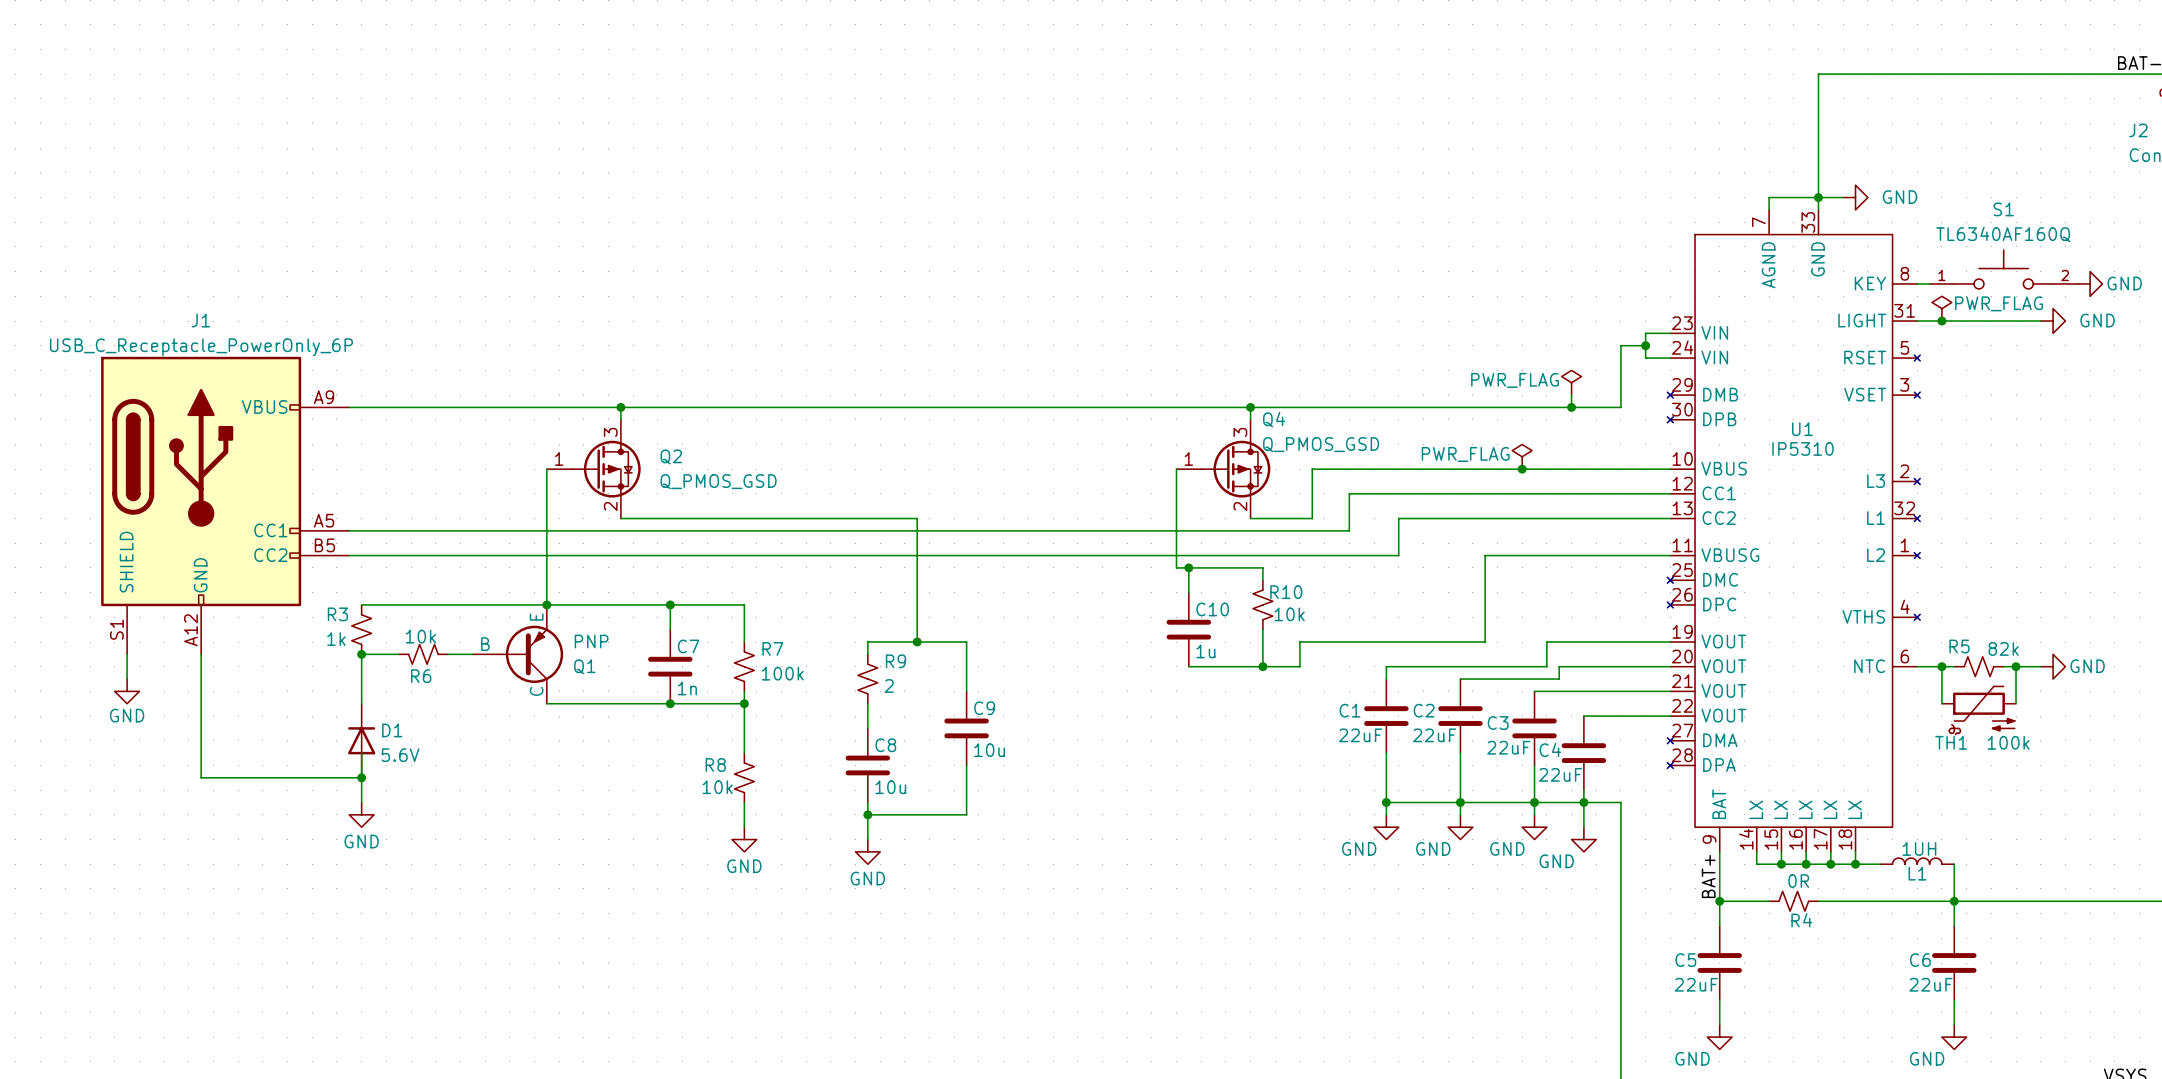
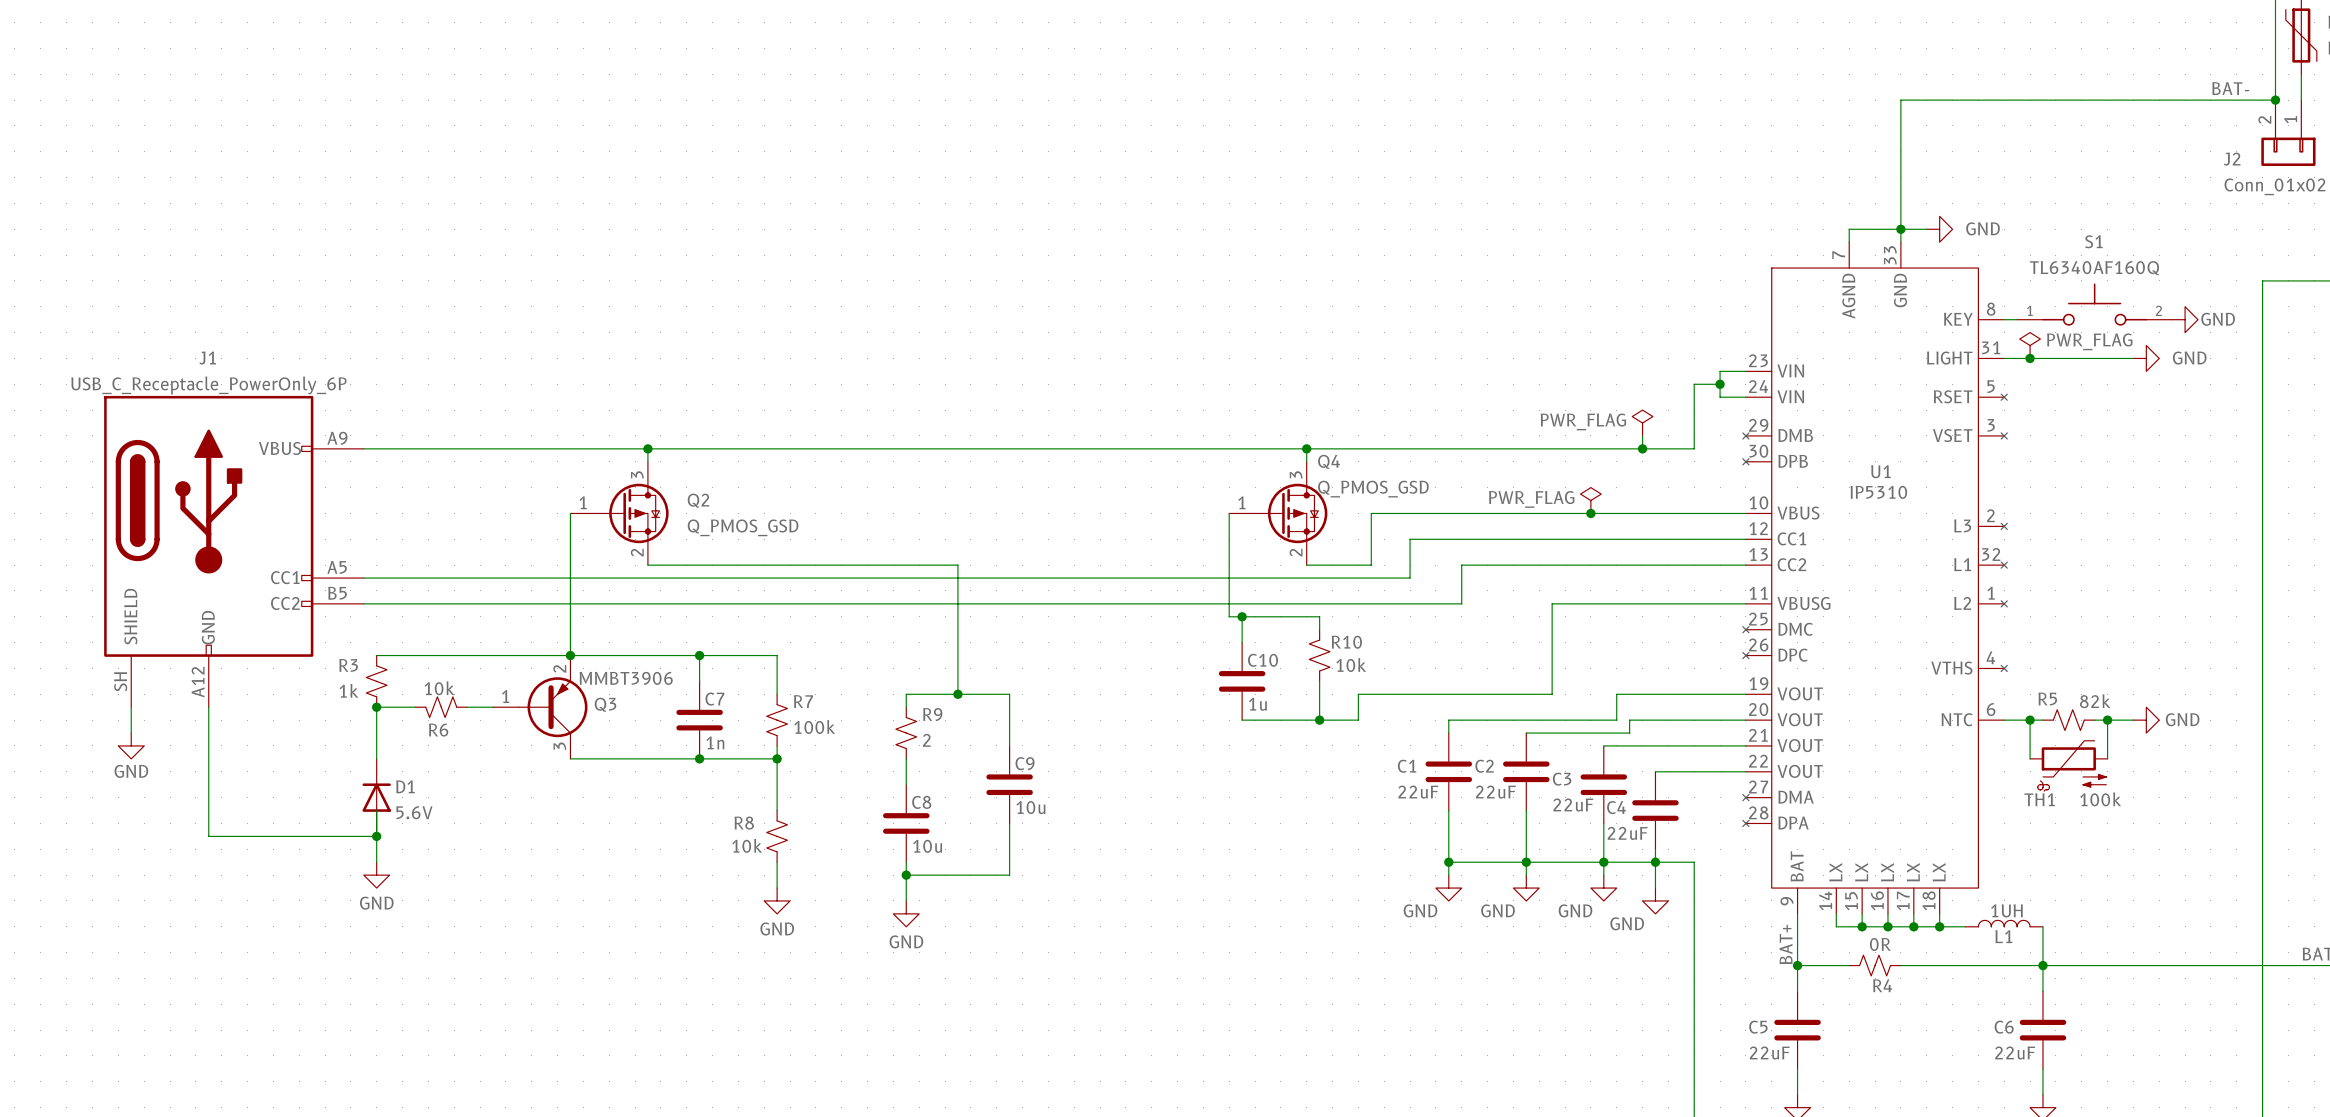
J1 pin number: S1 (116, 629) -> SH (120, 681)
Q1: PNP (517, 654) -> none
Q3: none -> MMBT3906 (540, 707)

